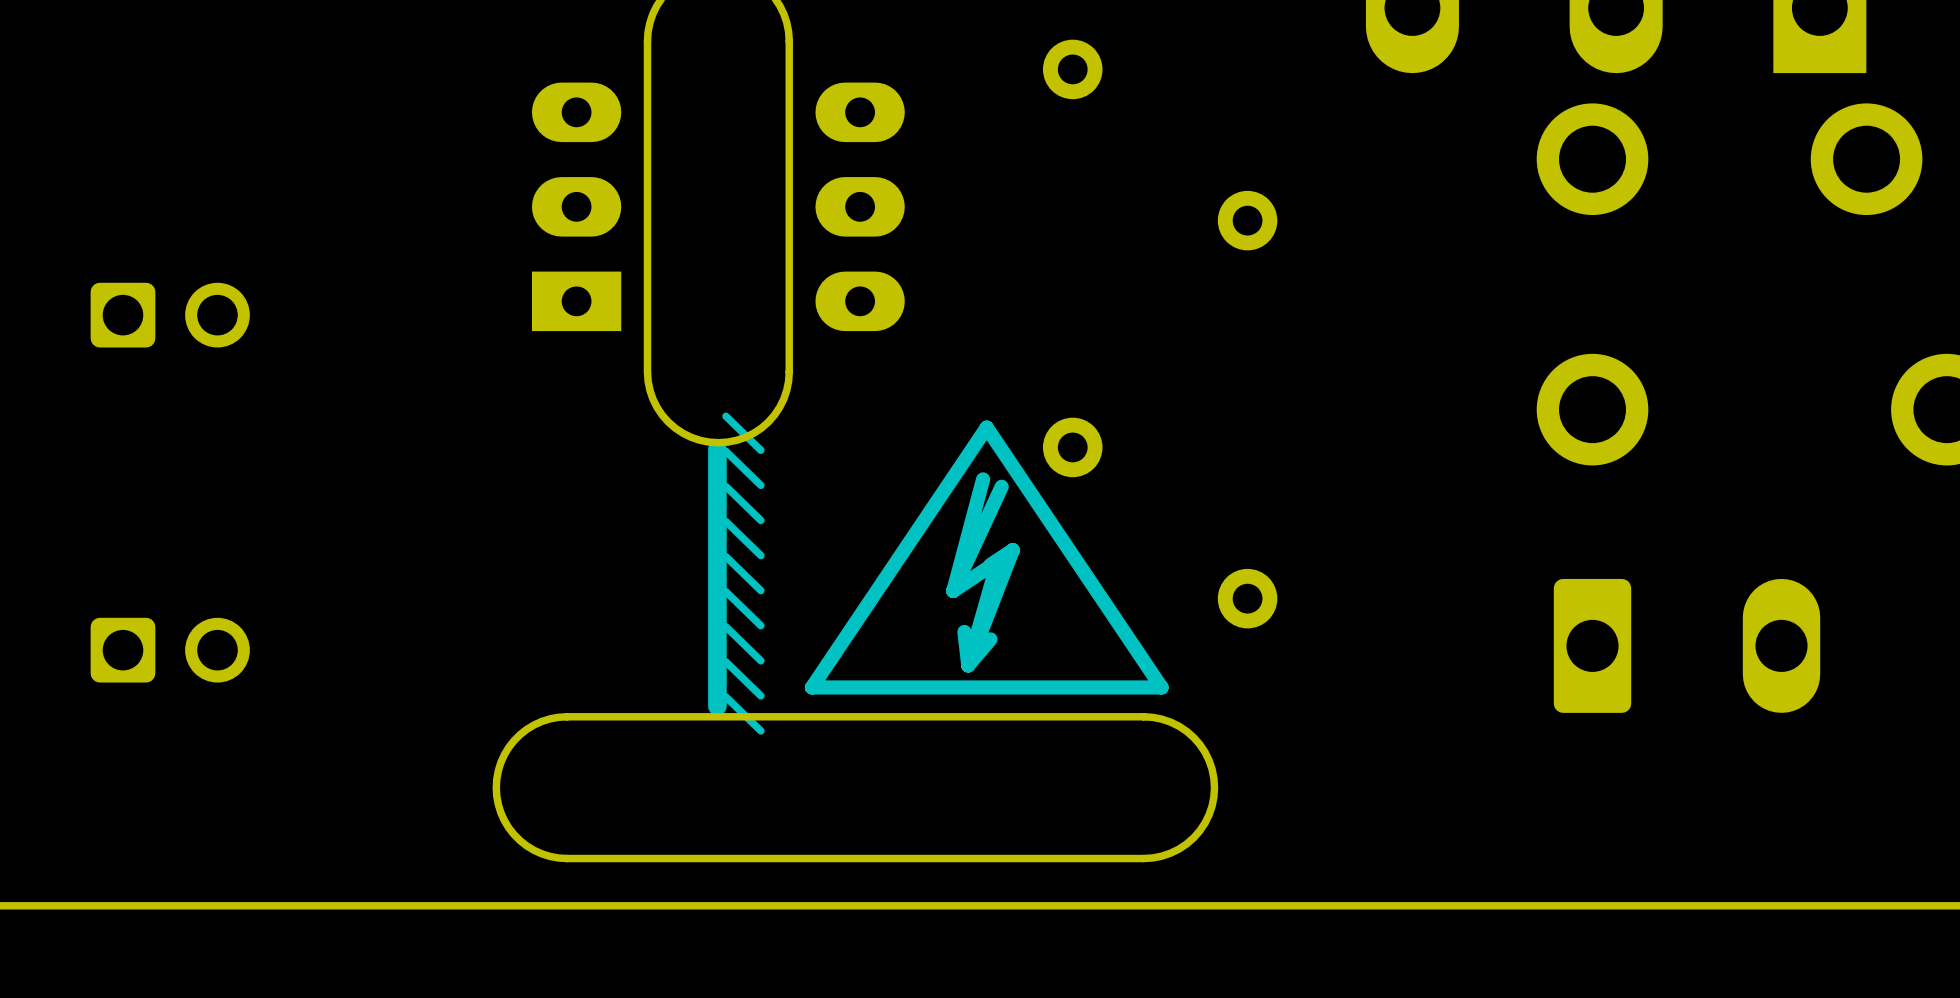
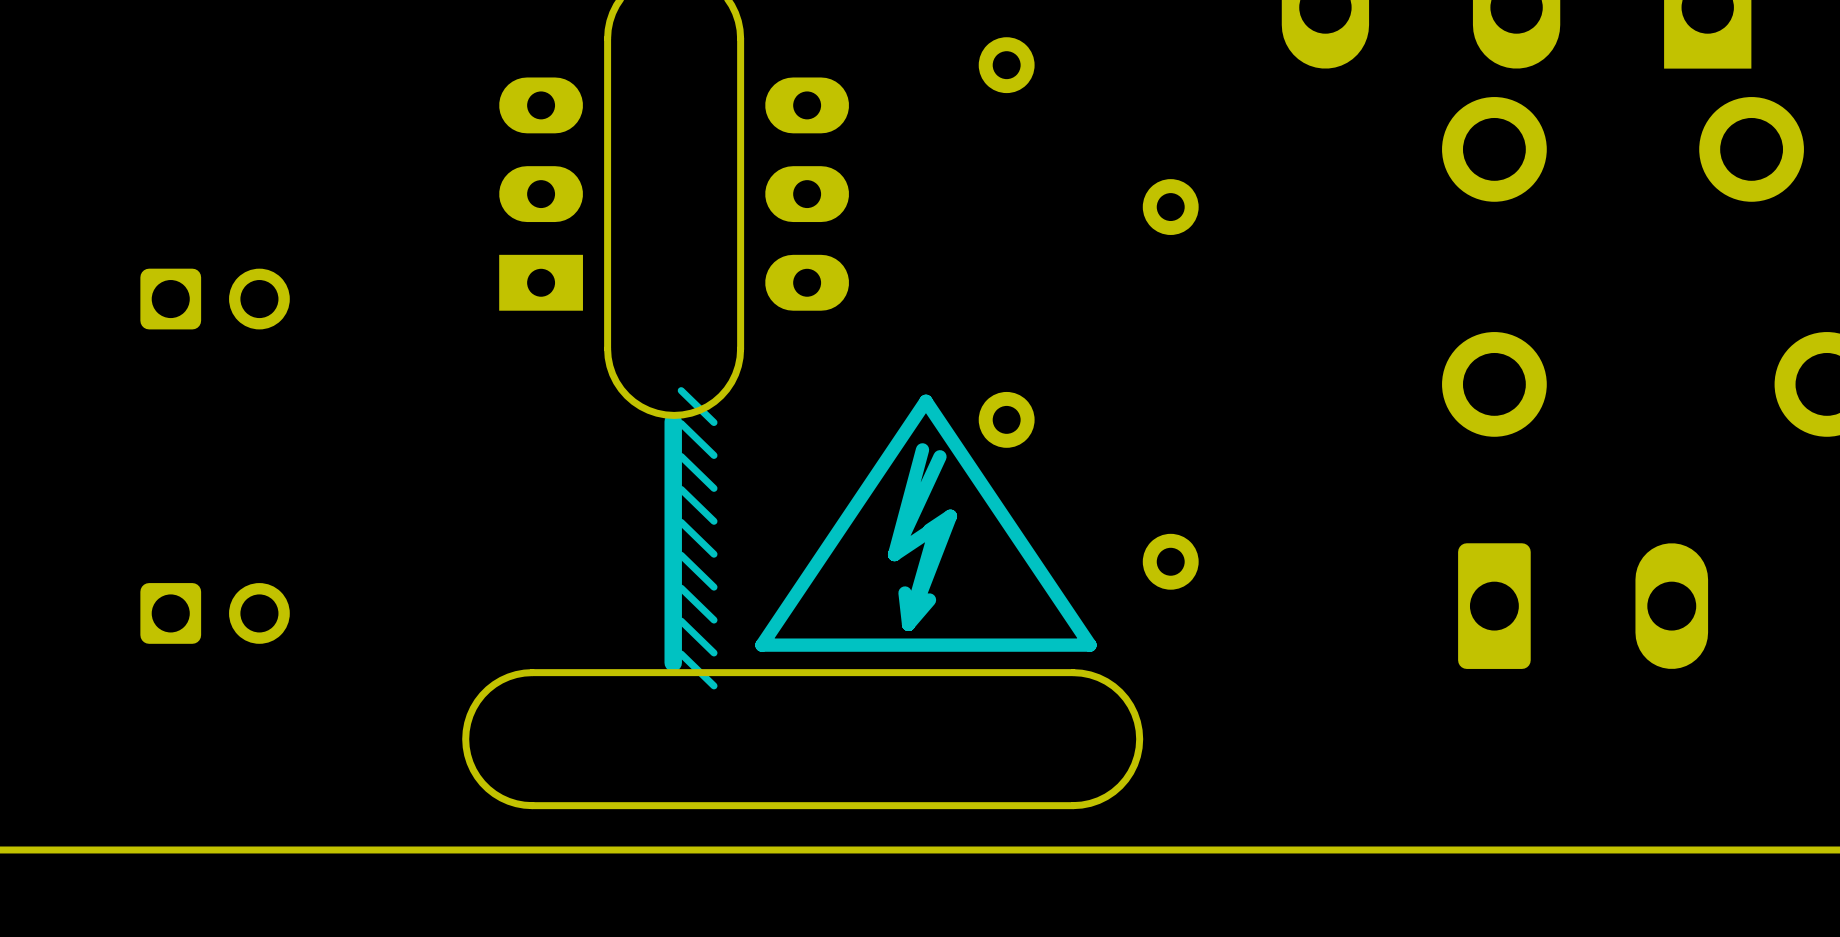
part position: (170, 315) -> (215, 299)
part position: (170, 650) -> (215, 613)

